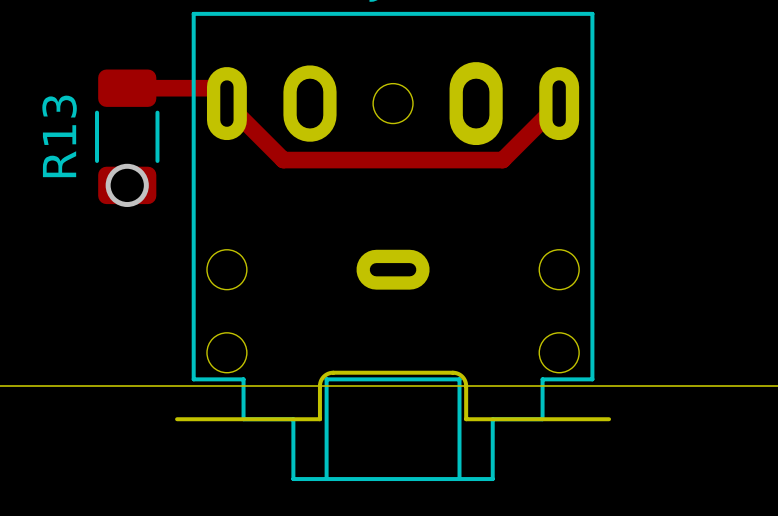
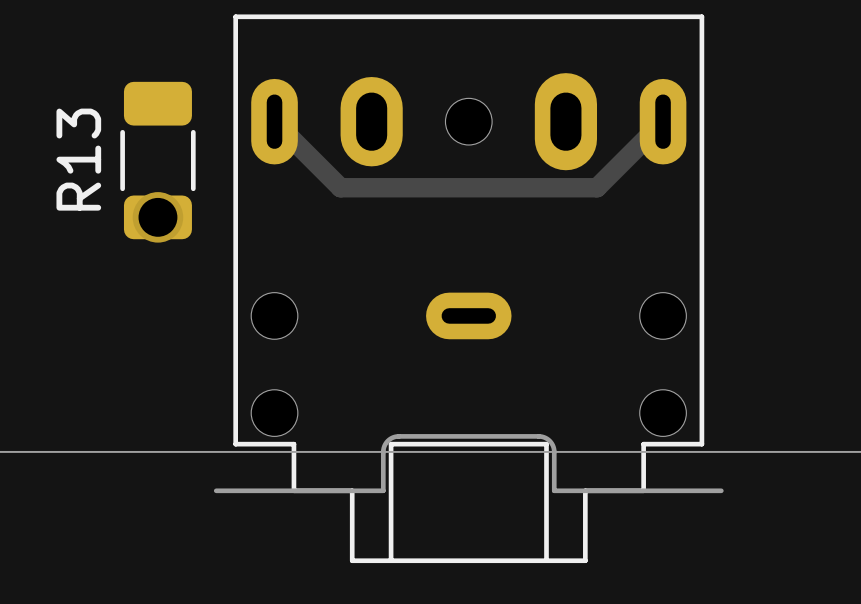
track: (127, 88) (211, 88) (226, 103) -> none

